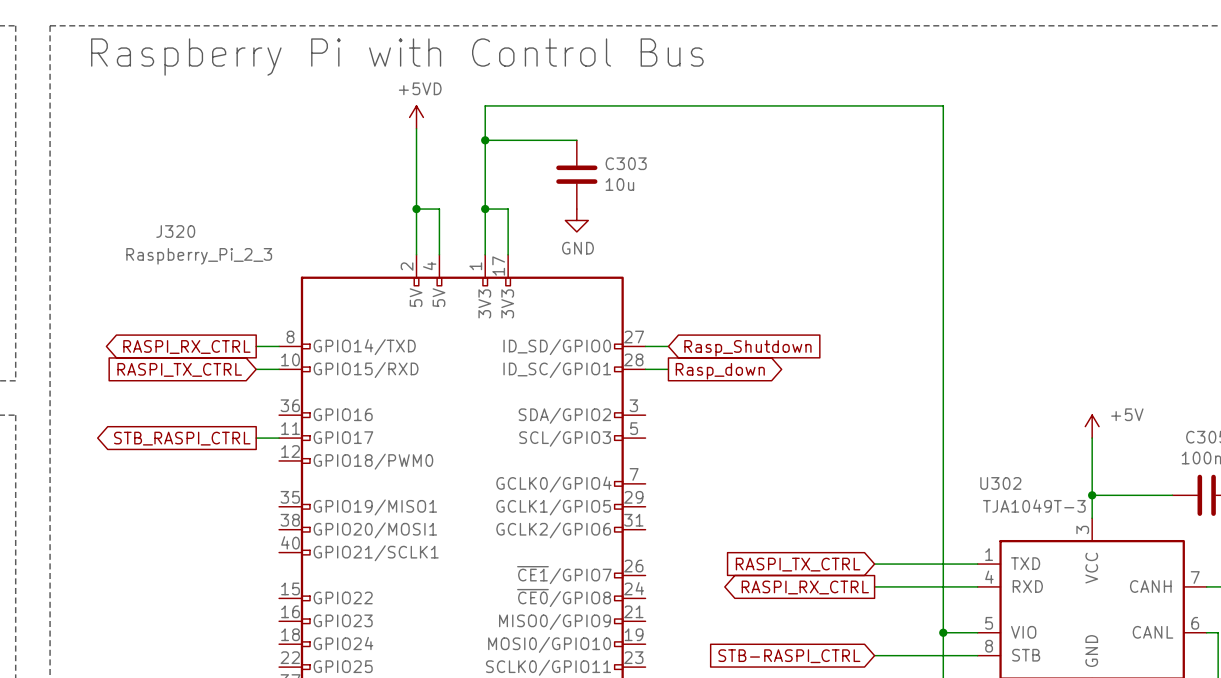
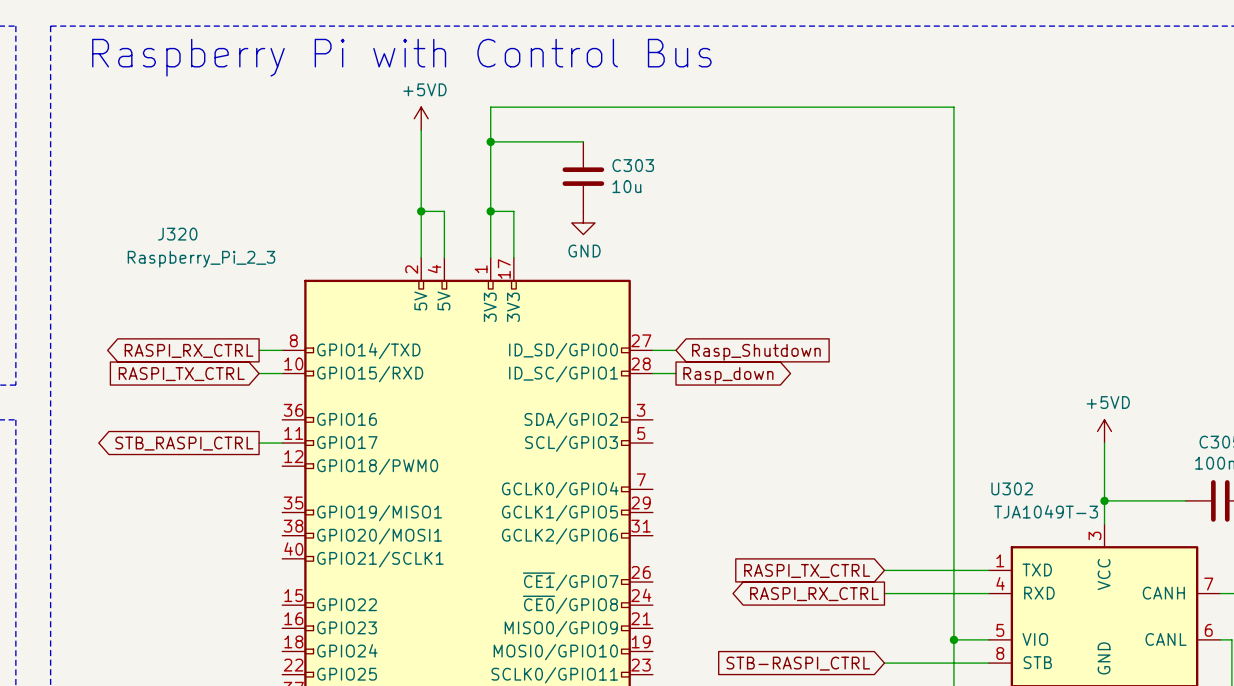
power symbol: +5V (1092, 426) -> +5VD (1104, 431)

